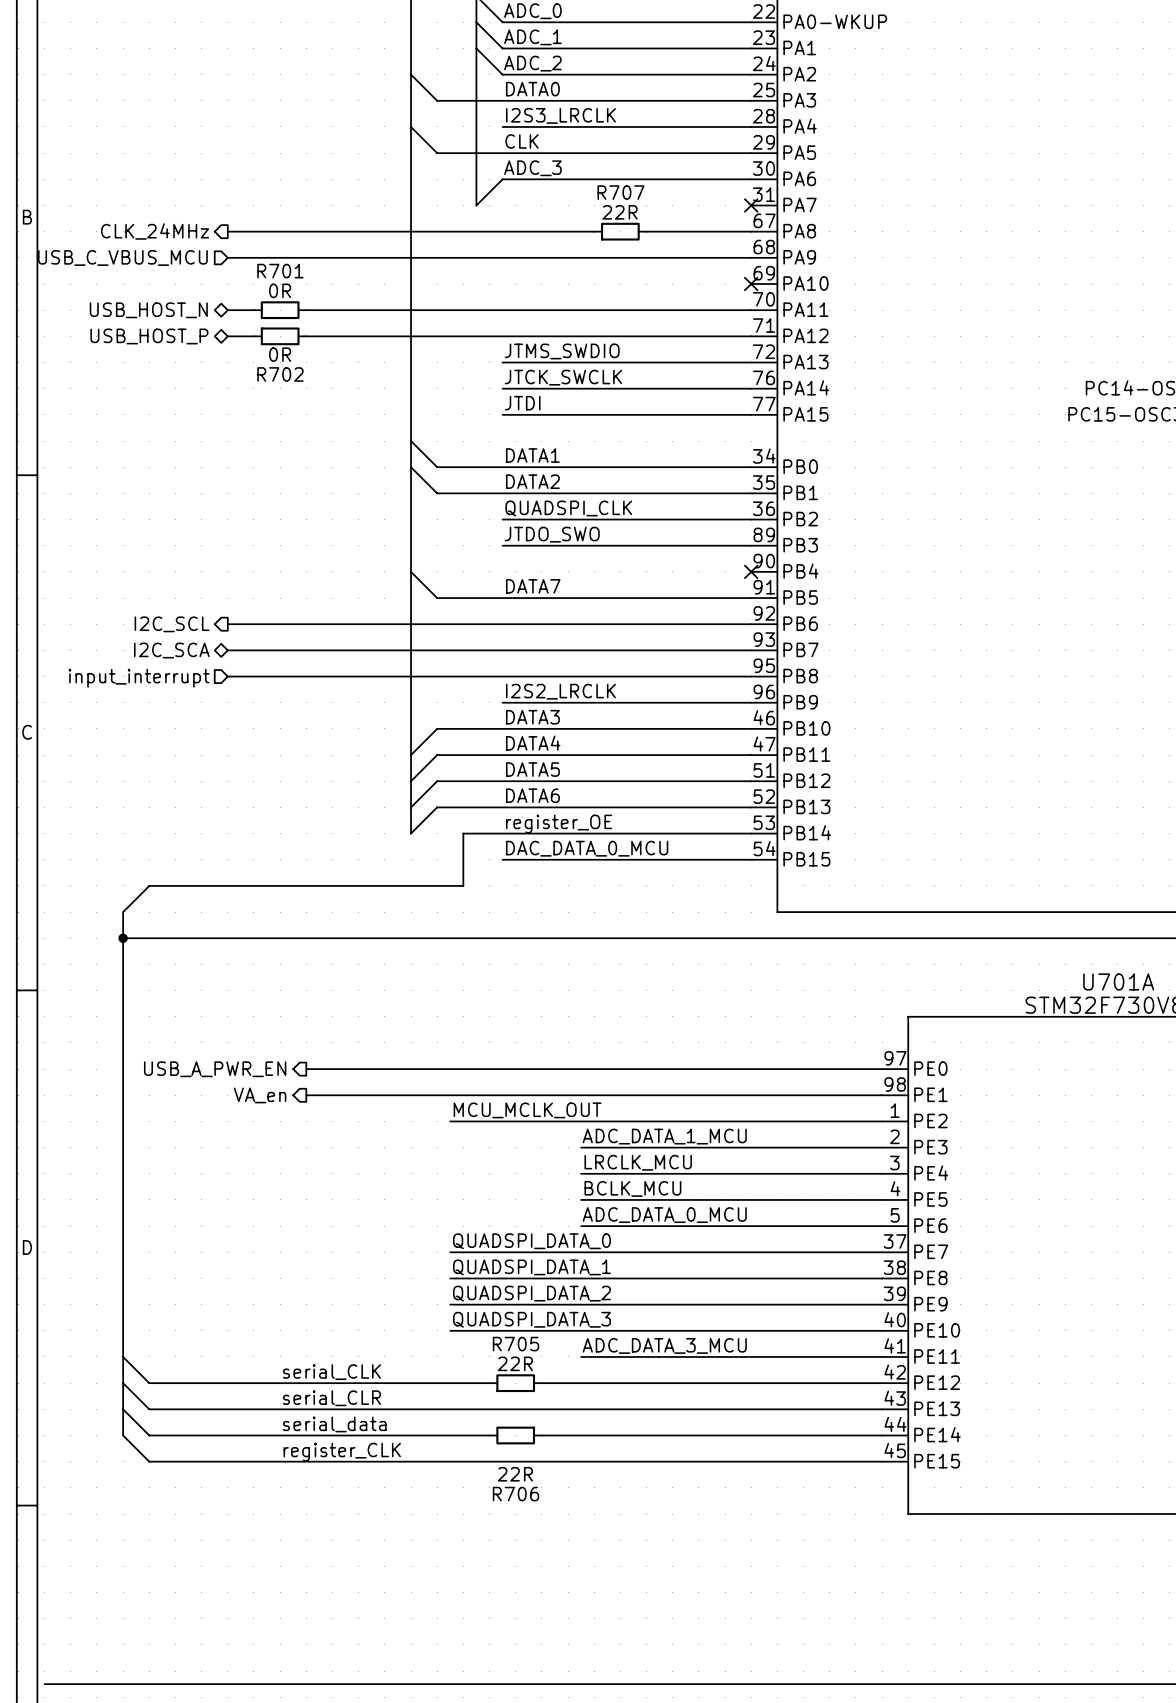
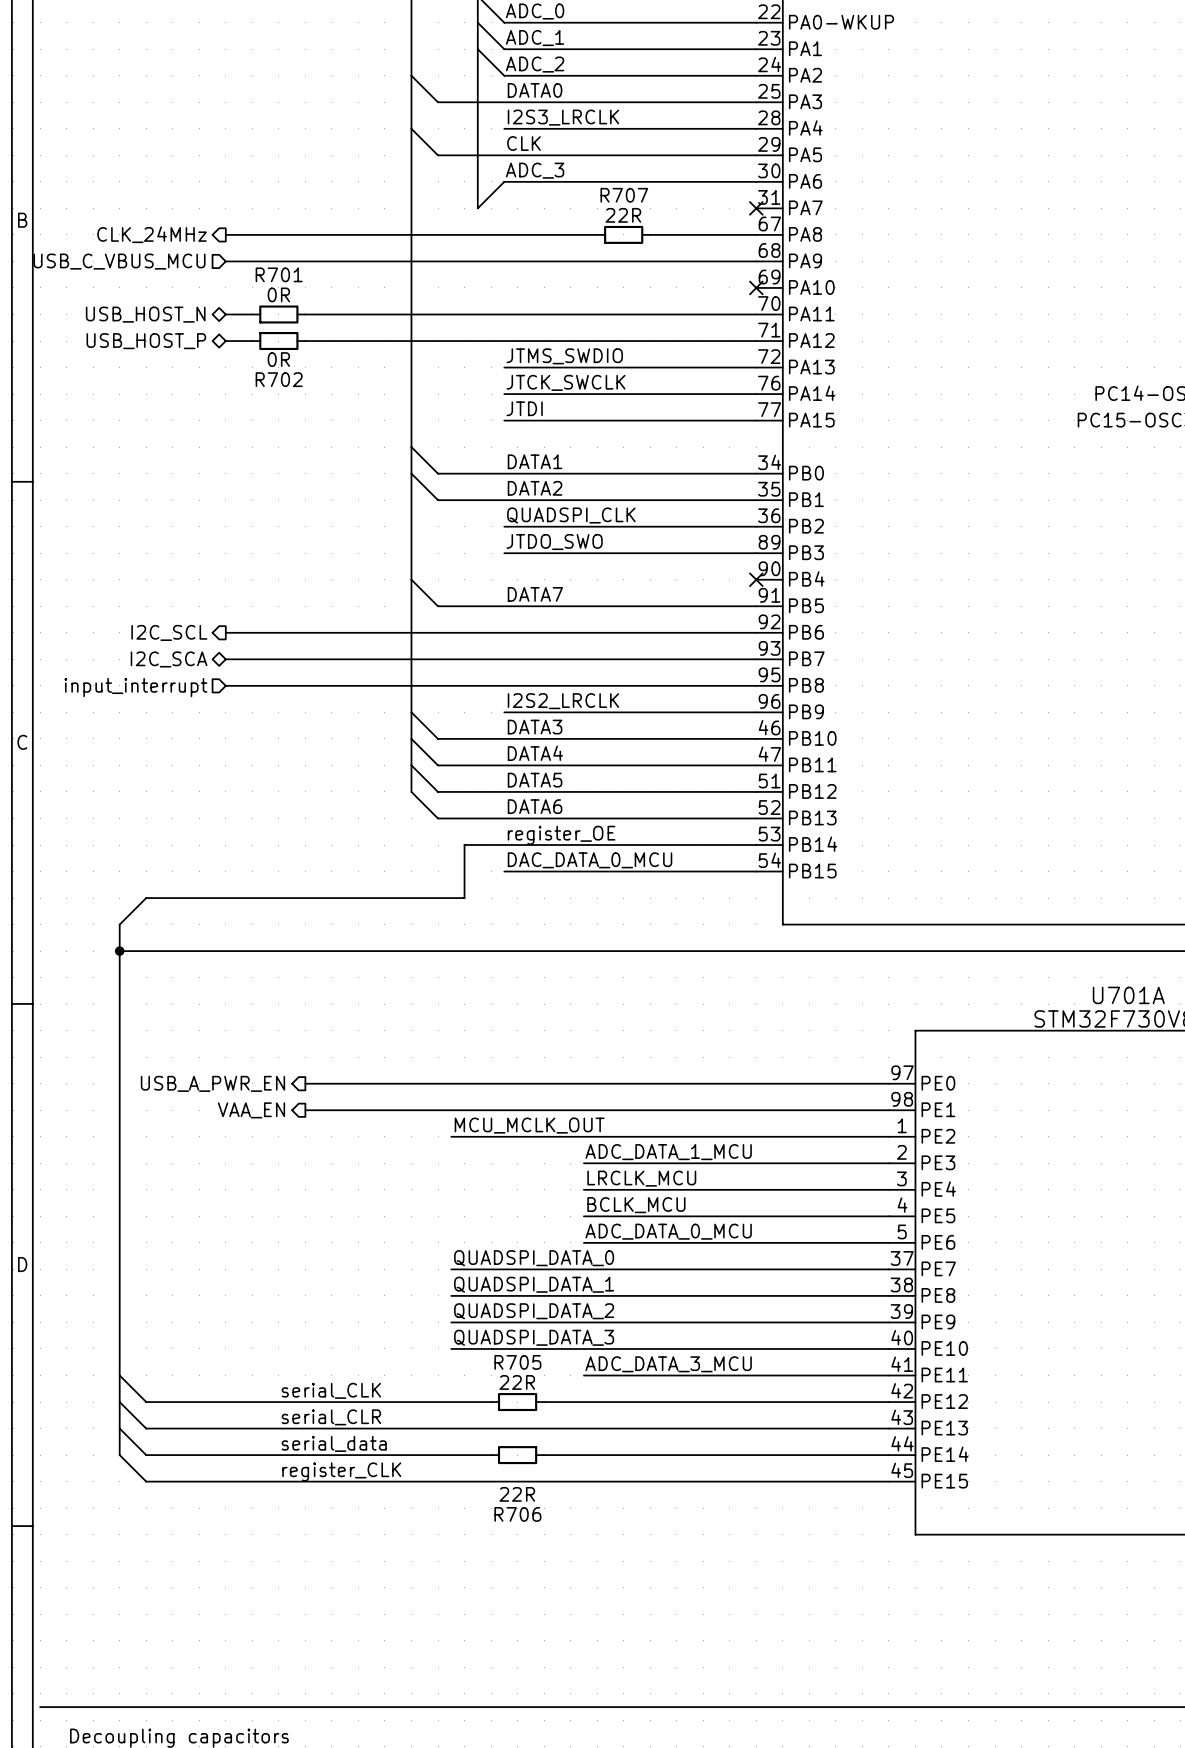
wire: (437, 728) (411, 755) -> (438, 738) (411, 712)
wire: (437, 755) (411, 781) -> (438, 765) (411, 738)
bus: (411, 781) (411, 833) -> none
wire: (437, 781) (411, 807) -> (438, 791) (411, 765)
wire: (437, 807) (411, 833) -> (438, 818) (411, 791)
hierarchical label: VA_en (260, 1095) -> VAA_EN (251, 1110)

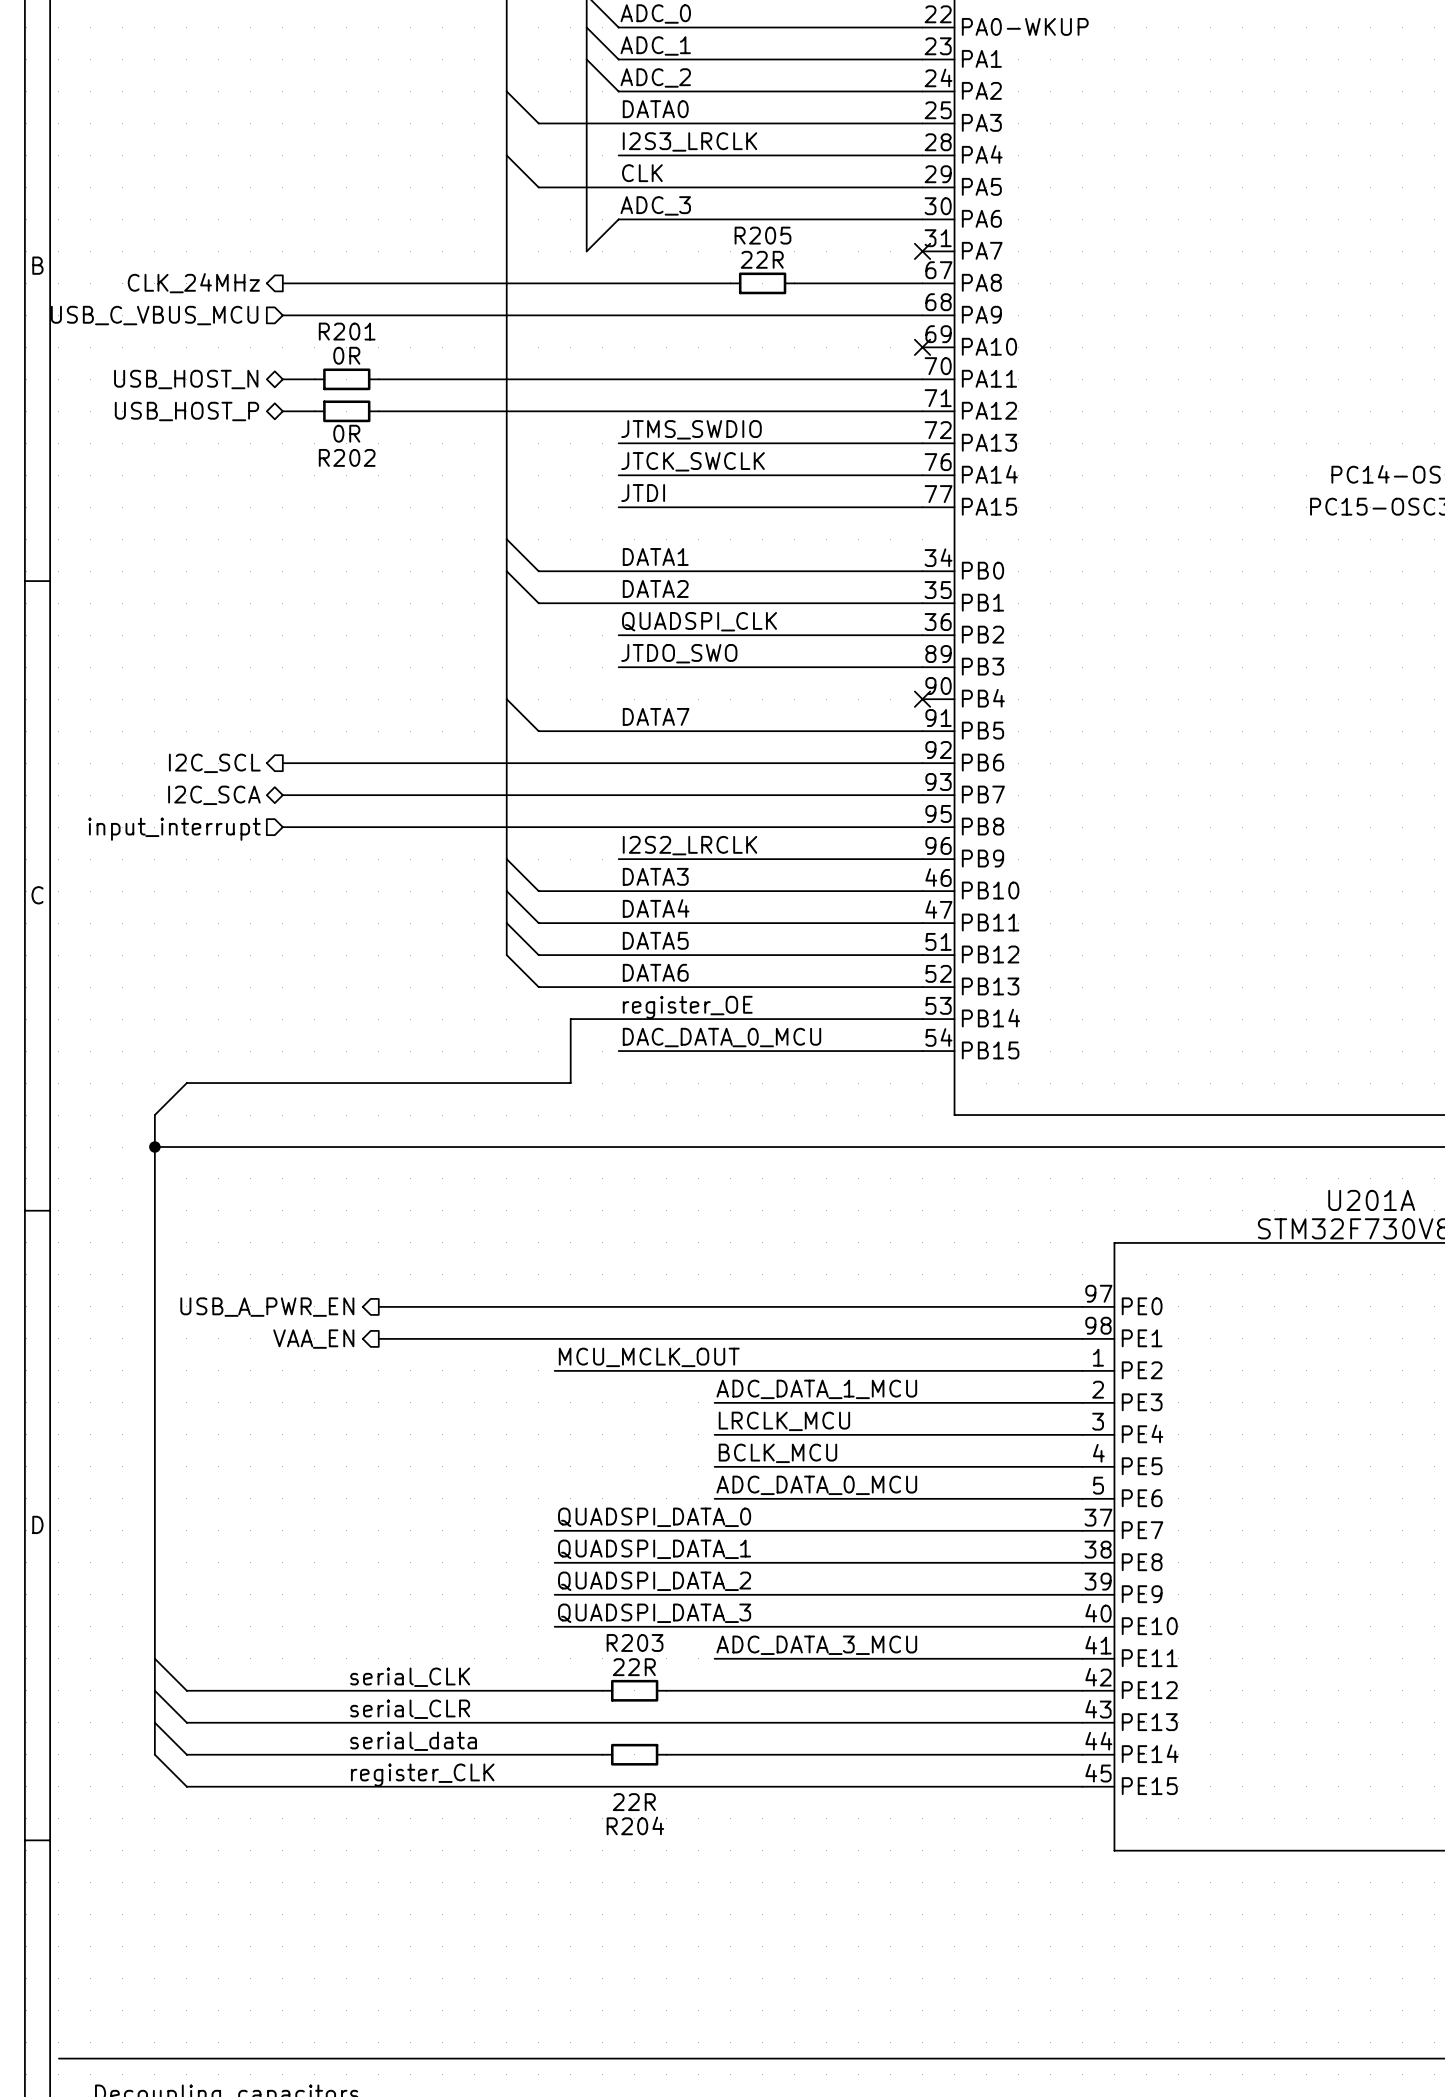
R707 name: R707 (624, 195) -> R205 (762, 235)
R701 name: R701 (279, 274) -> R201 (347, 331)
R702 name: R702 (279, 379) -> R202 (347, 457)
U701A name: U701A (1128, 995) -> U201A (1371, 1200)
R705 name: R705 (517, 1362) -> R203 (635, 1642)
R706 name: R706 (517, 1514) -> R204 (635, 1825)

